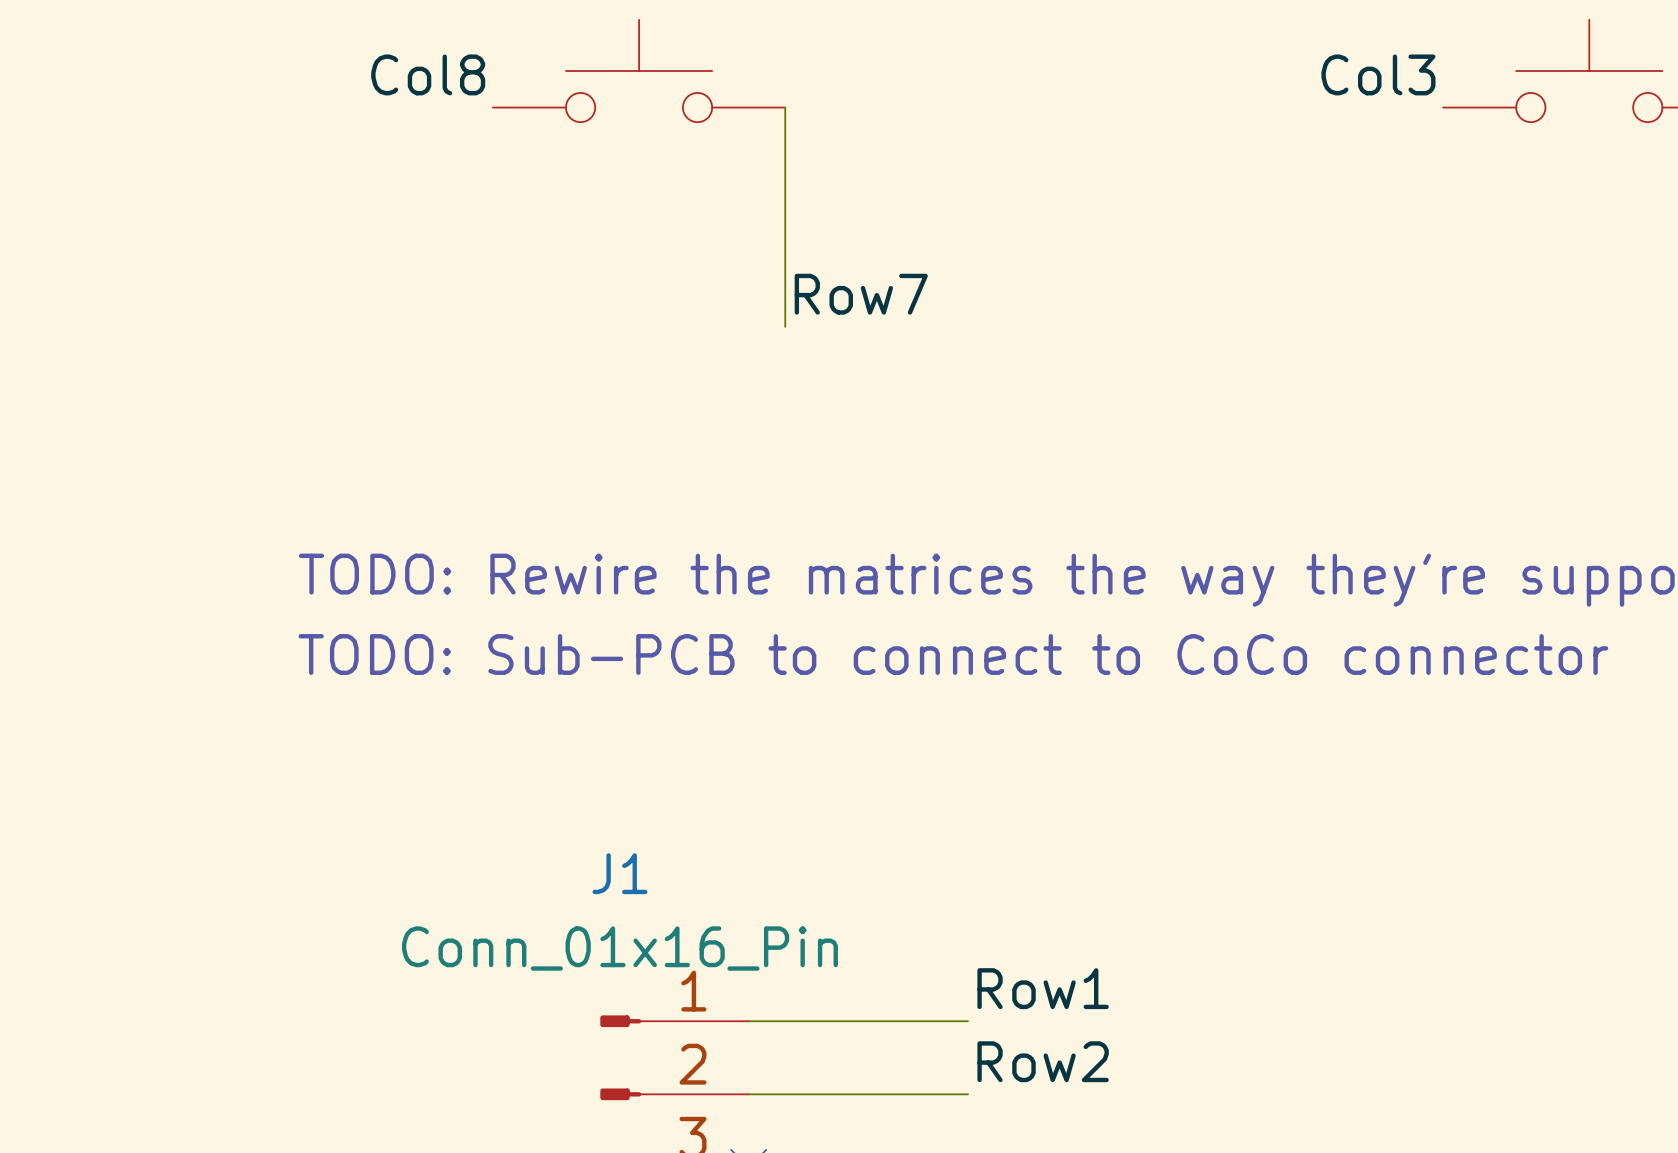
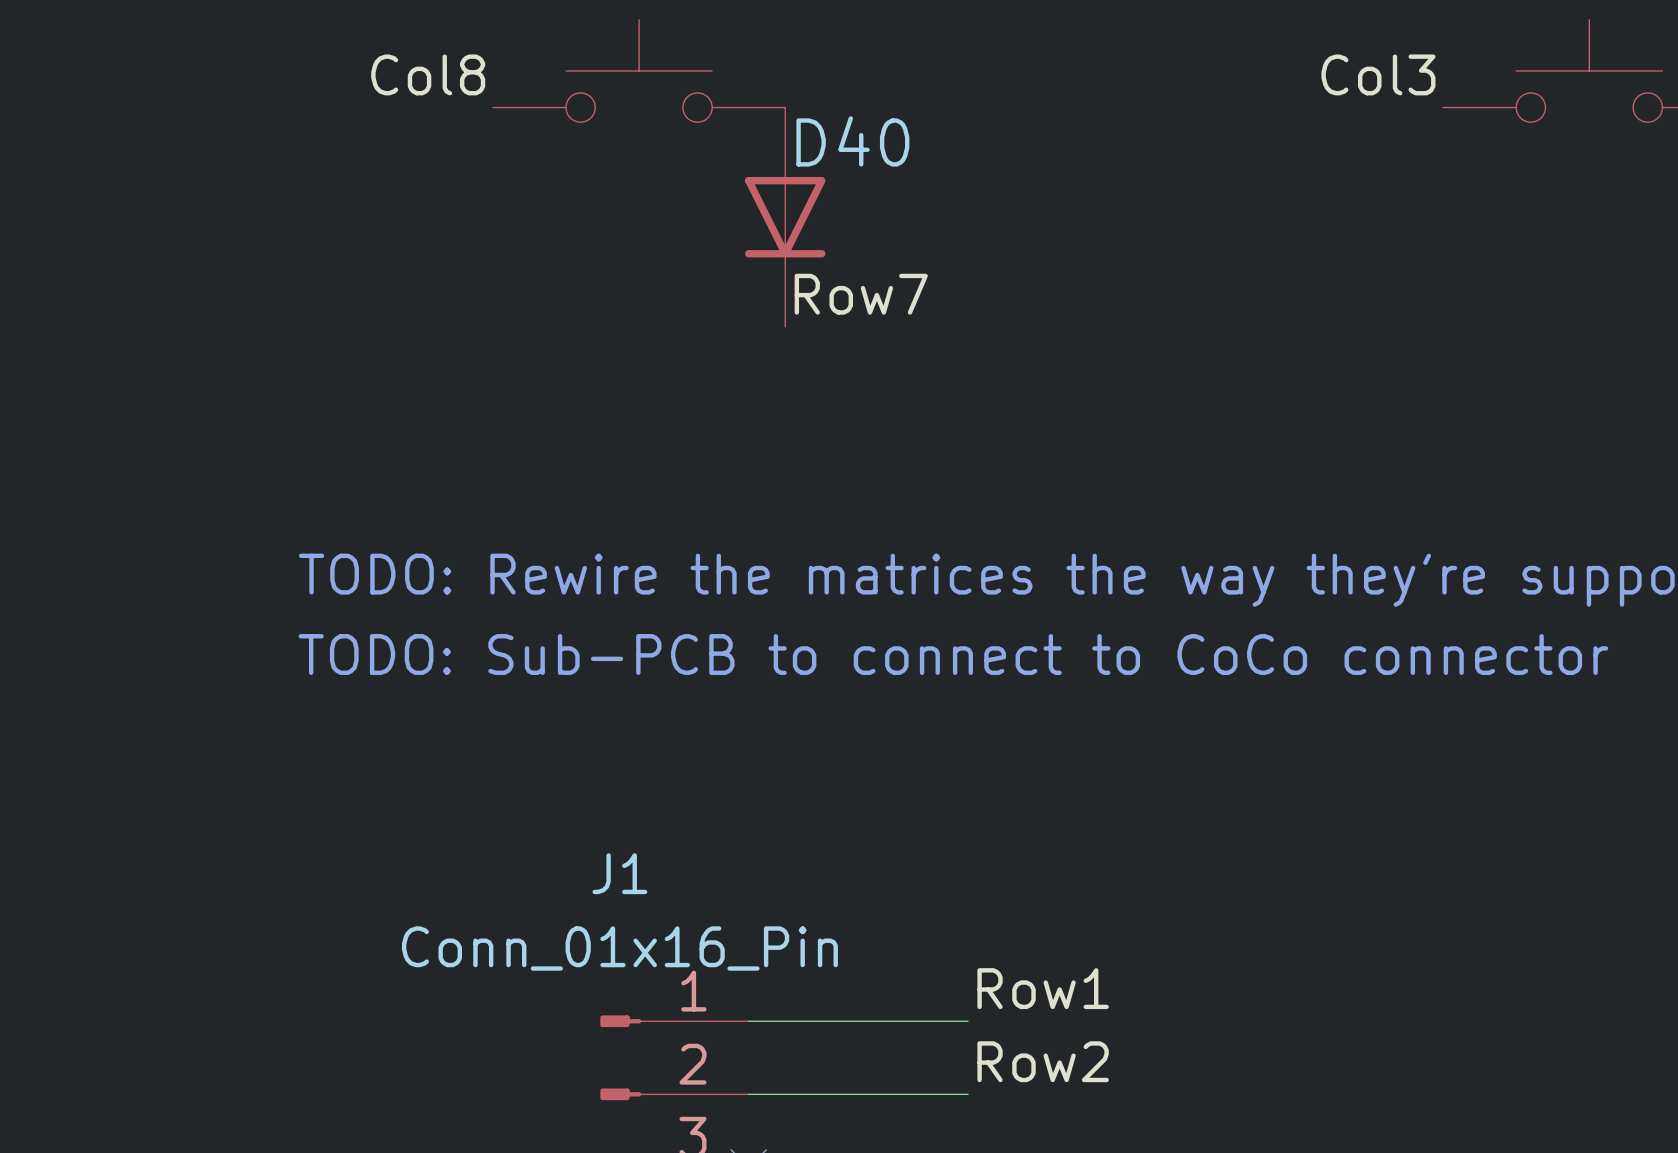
D40: none -> (785, 217)

